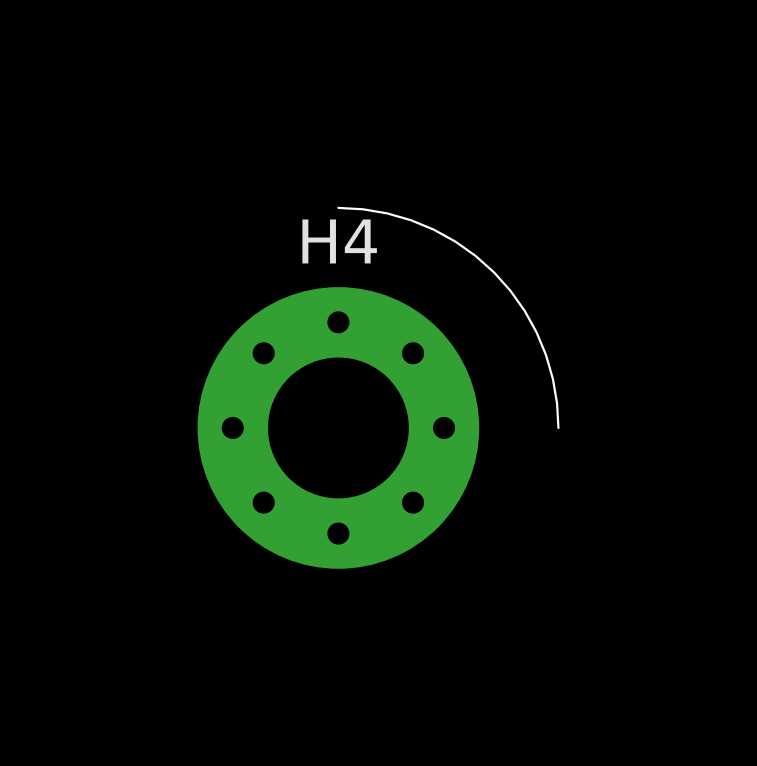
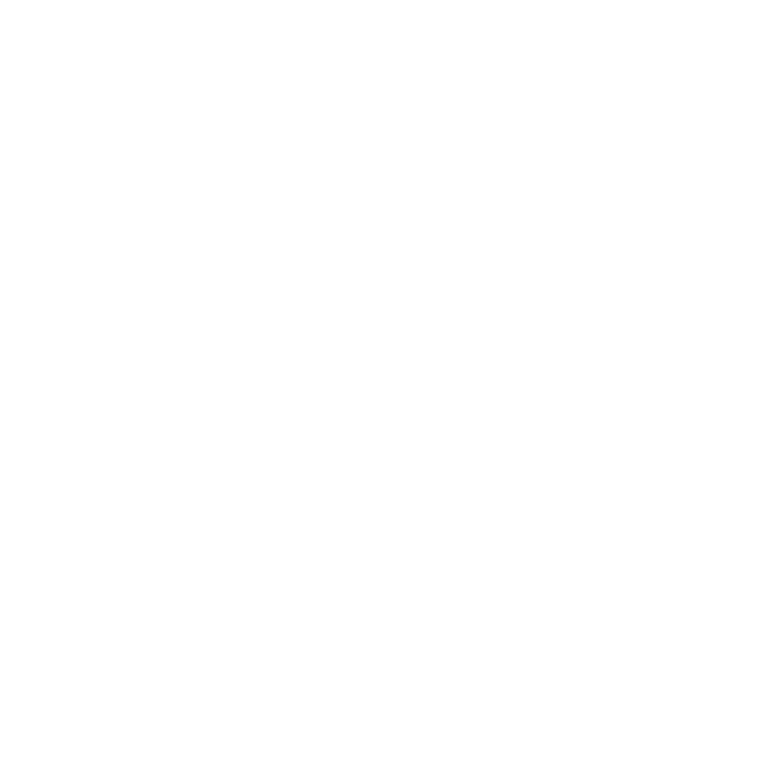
board edge: (338, 207) (387, 213) (411, 220) (455, 241) (493, 272) (524, 310) (546, 355) (557, 403) (558, 427) -> none
H4: (338, 427) -> none

